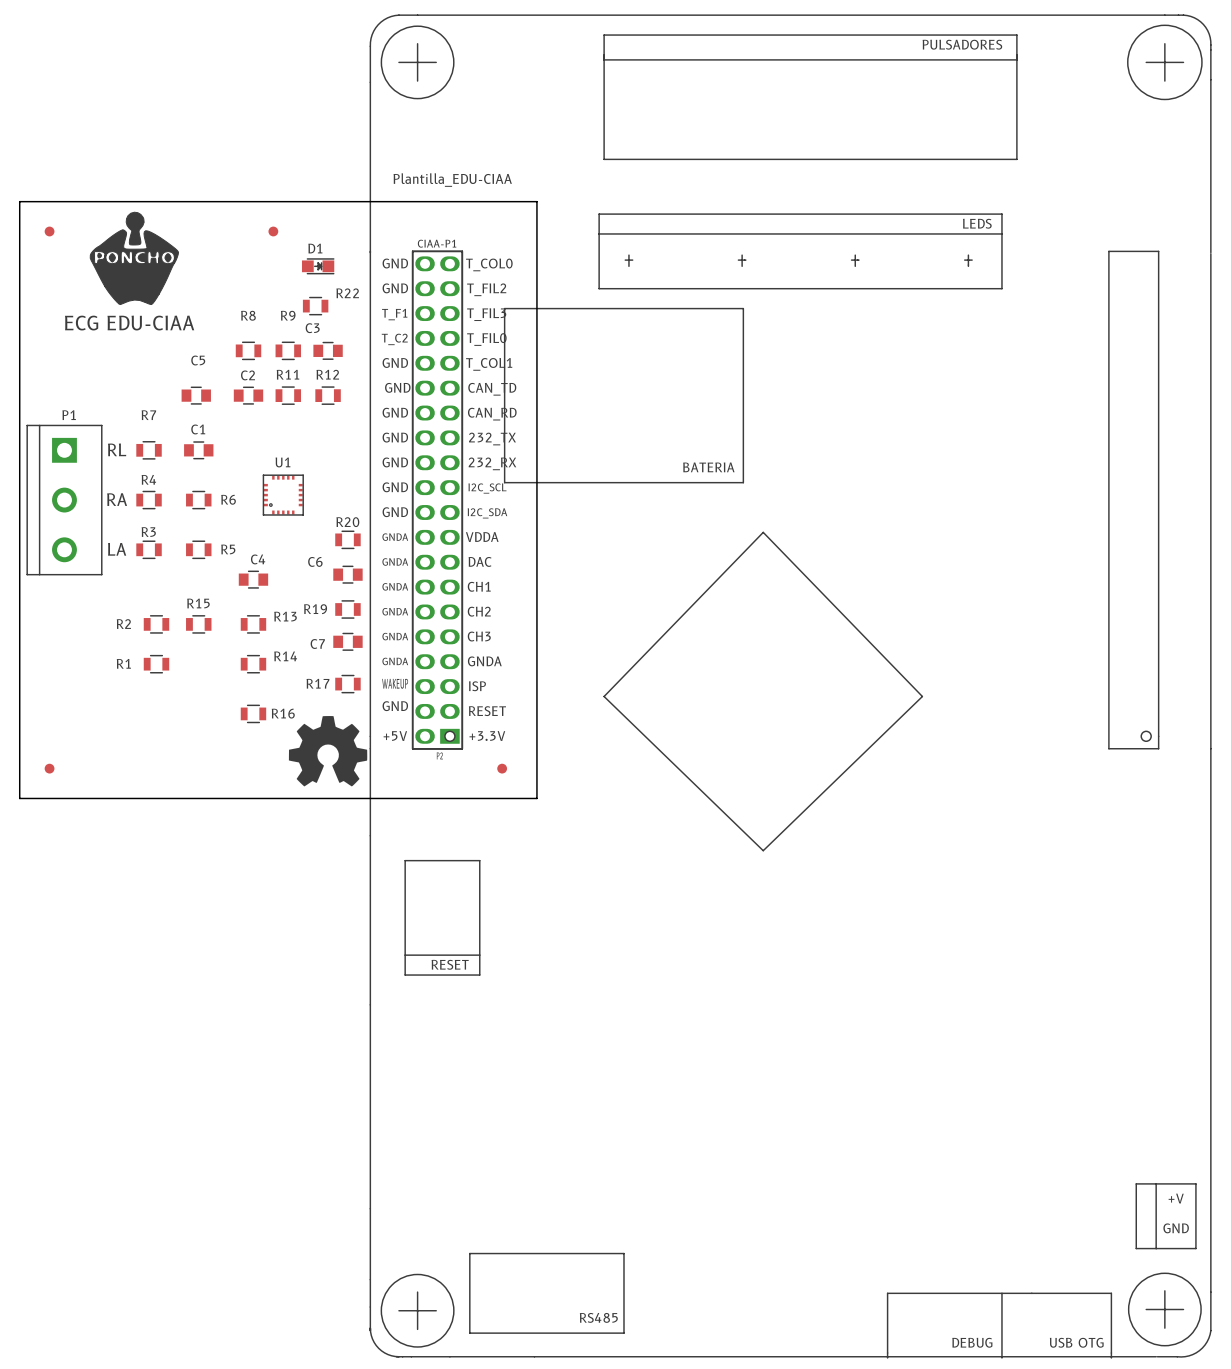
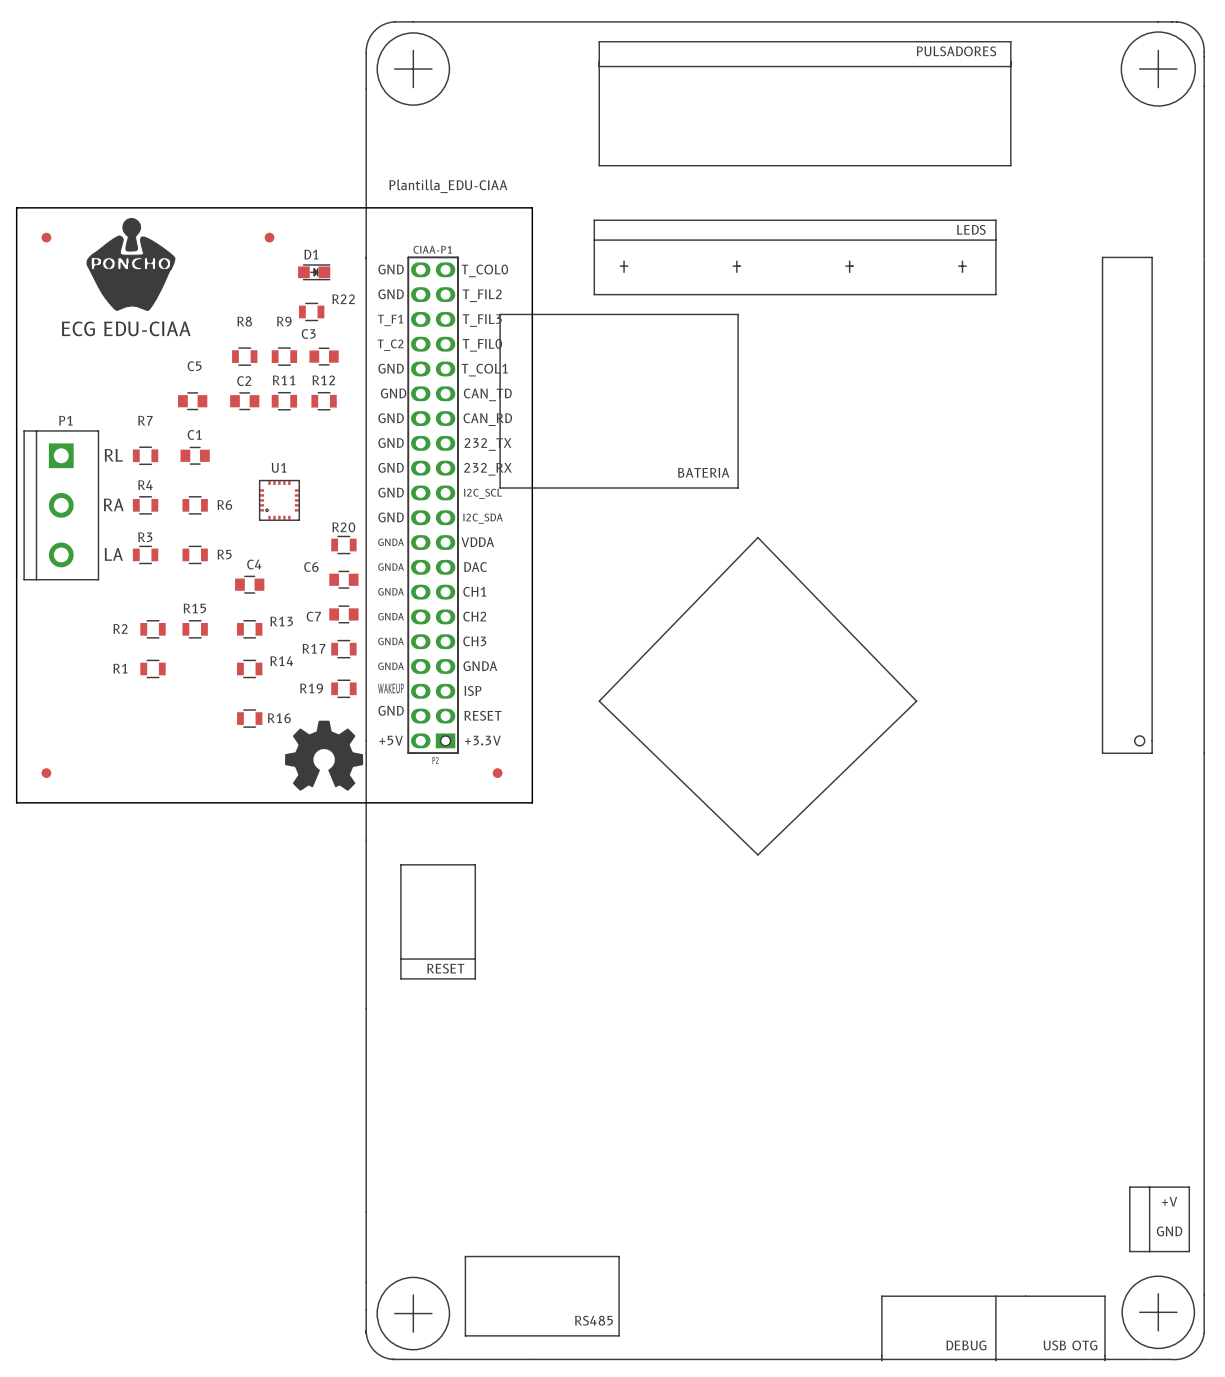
R19: (347, 609) -> none
C7 position: (347, 641) -> (343, 614)
R17: none -> (343, 649)
R17 name: R17 (317, 683) -> R19 (311, 688)

